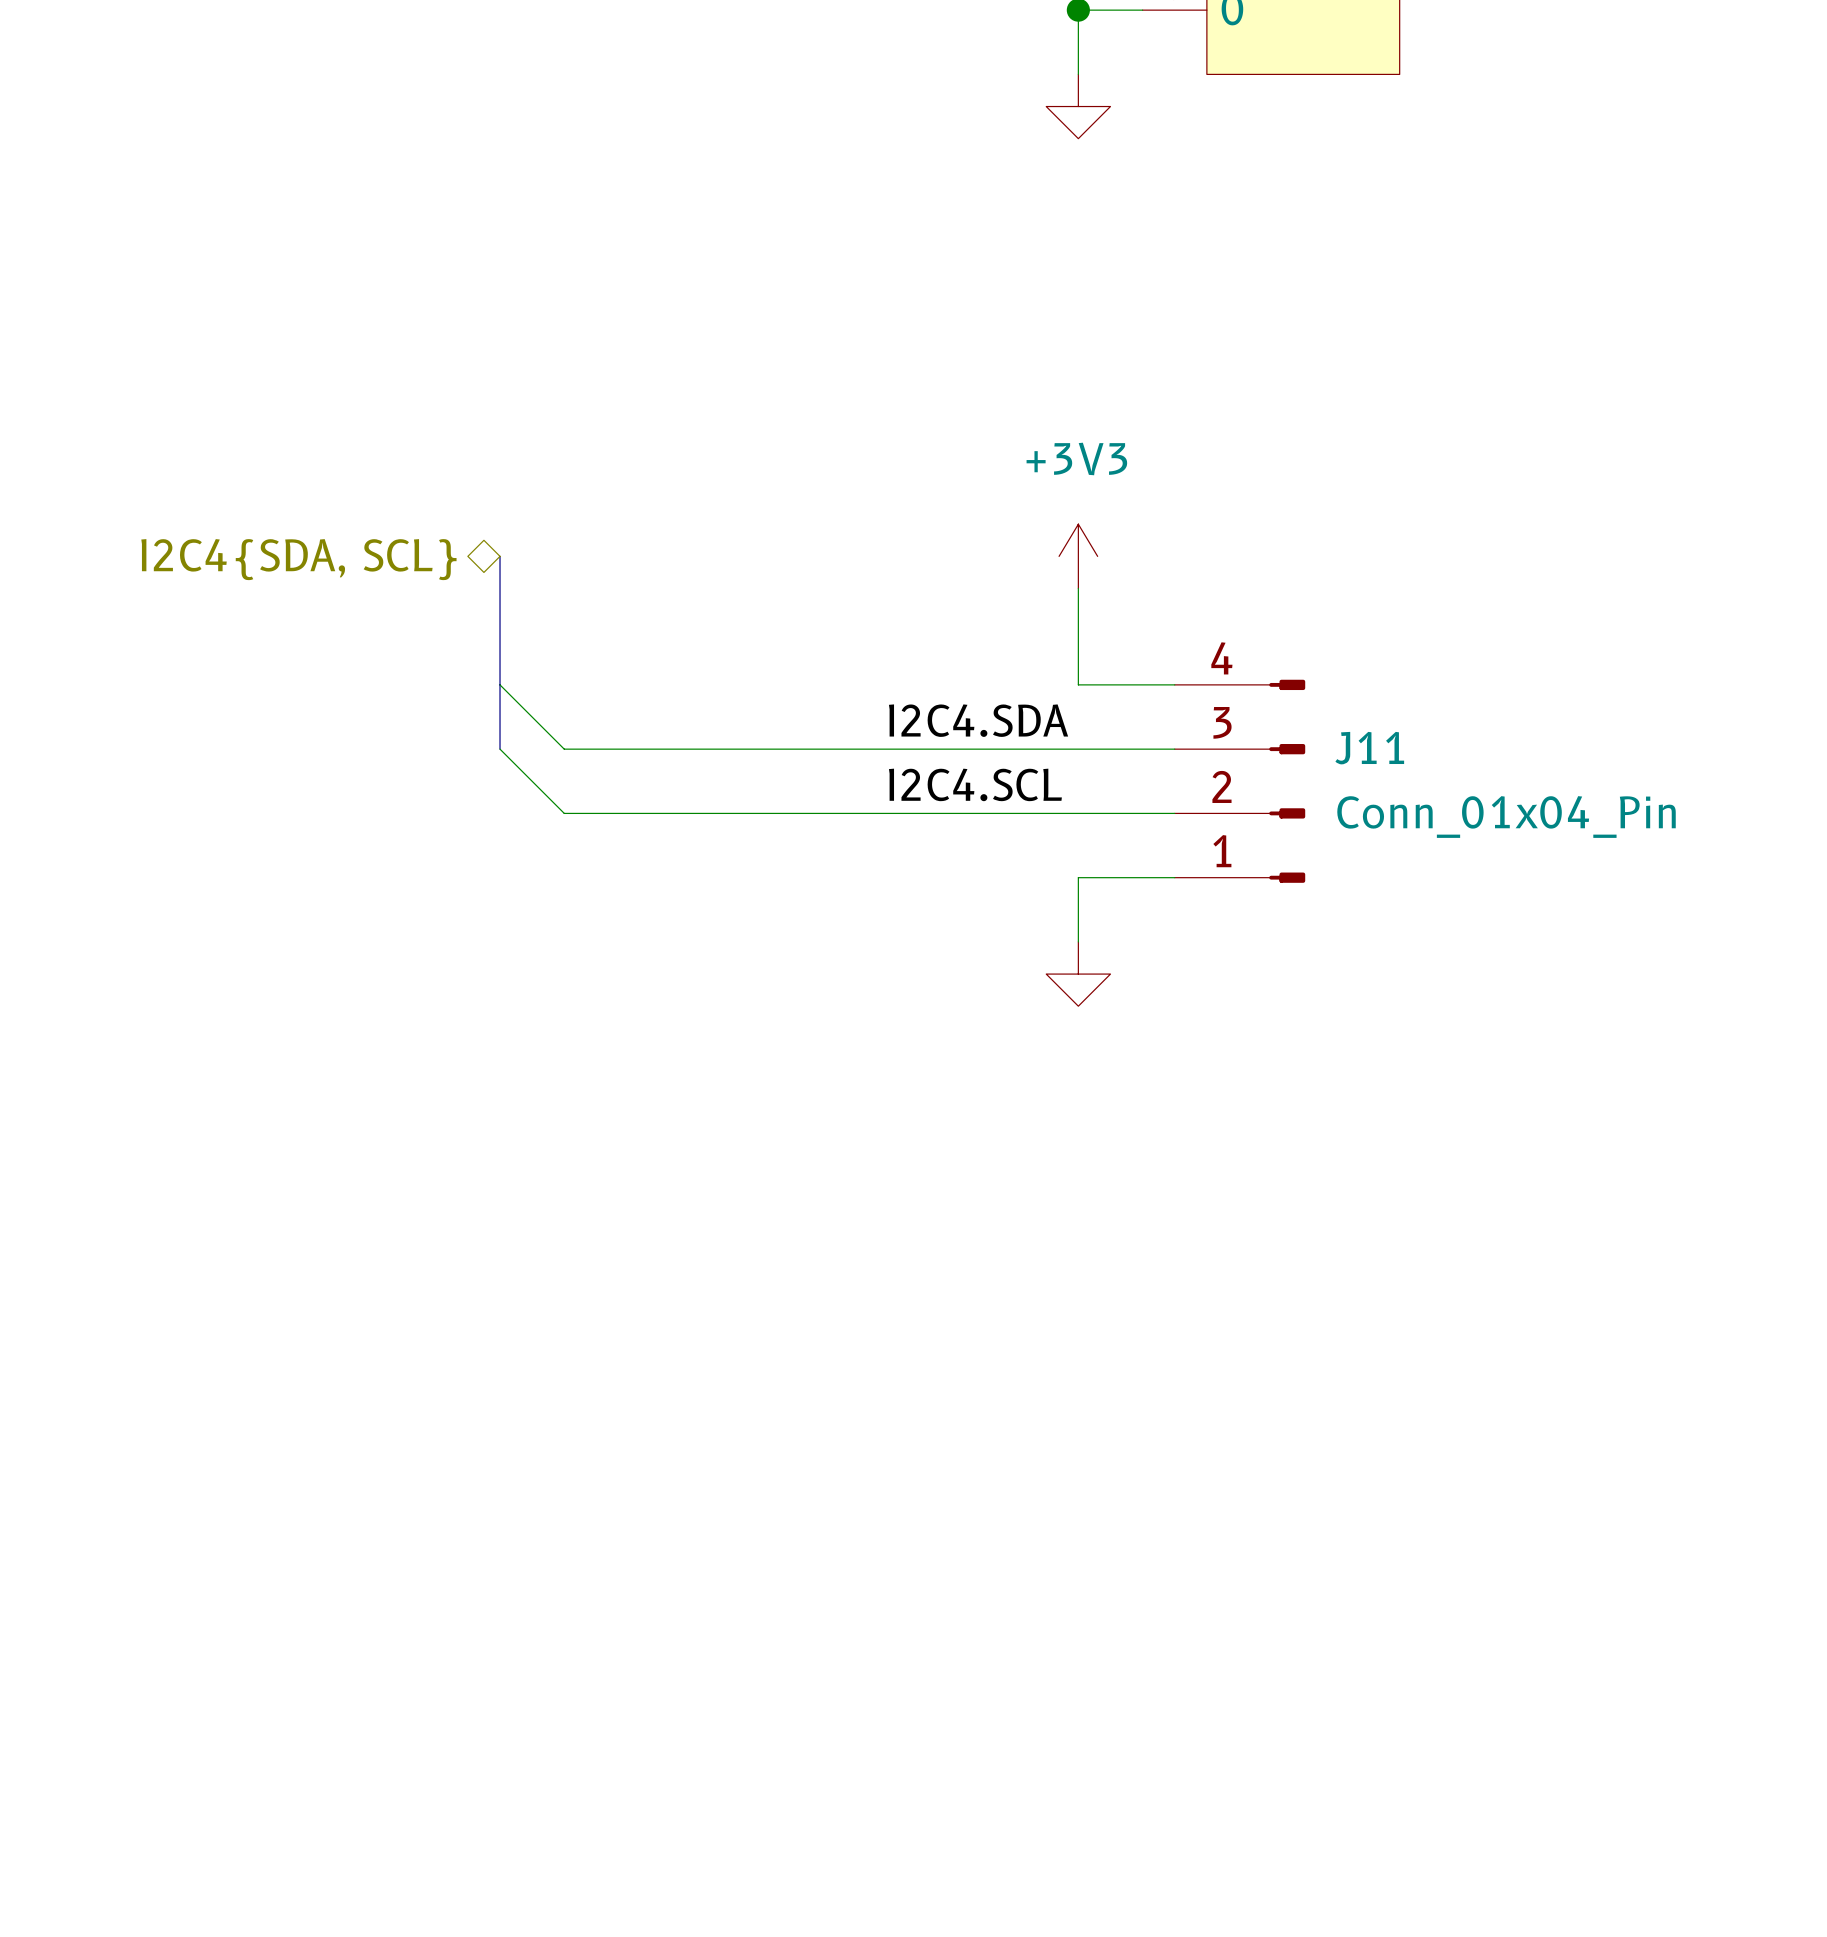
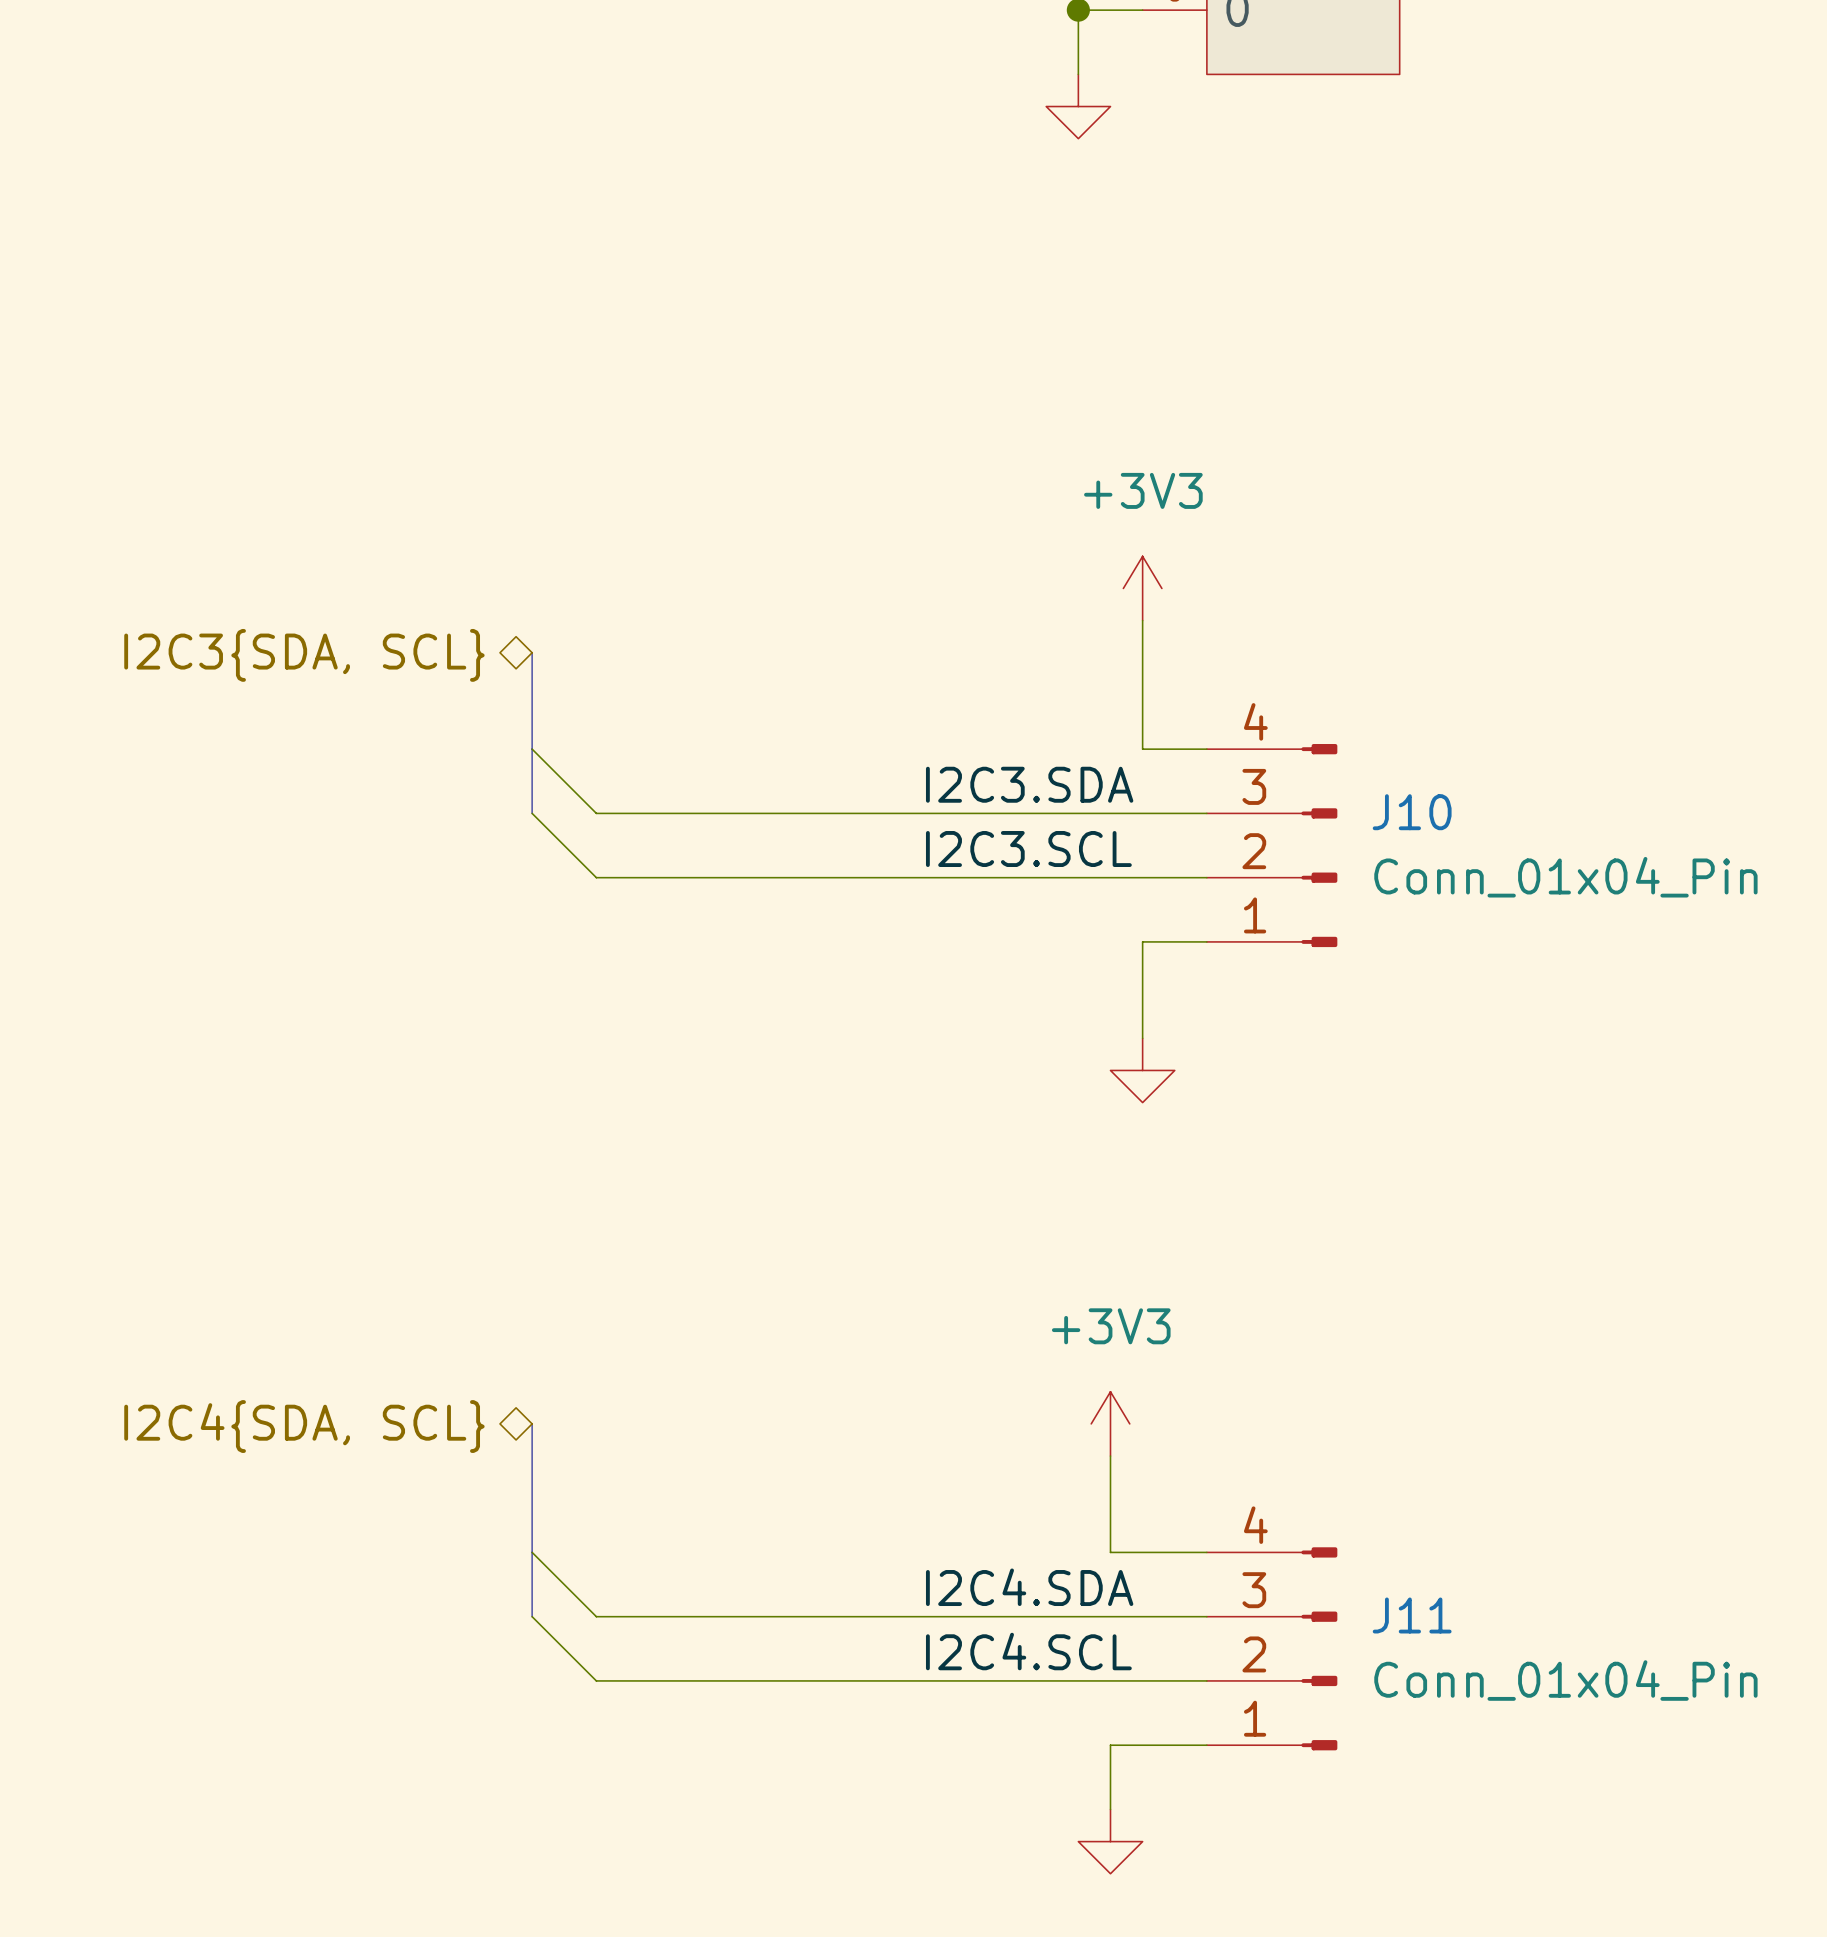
bus: (500, 556) (500, 749) -> none
power symbol position: +3V3 (1078, 556) -> +3V3 (1142, 588)
hierarchical label: I2C4{SDA, SCL} (298, 559) -> none
wire: (1078, 588) (1078, 684) (1174, 684) -> none
bus: none -> (532, 652) (532, 813)
hierarchical label: none -> I2C3{SDA, SCL} (304, 655)
wire: (500, 684) (564, 749) (1142, 749) -> (1142, 620) (1142, 749)
label: I2C4.SDA (978, 720) -> none
wire: (500, 749) (564, 813) (596, 813) -> (532, 749) (596, 813)
J11 position: (1239, 781) -> (1272, 1648)
label: I2C4.SCL (975, 784) -> I2C3.SDA (1029, 784)
J10: none -> Conn_01x04_Pin (1272, 845)
label: none -> I2C3.SCL (1028, 849)
wire: (1078, 877) (1078, 941) -> (1078, 877) (596, 877) (532, 813)
wire: none -> (1206, 941) (1142, 941) (1142, 1038)
power symbol position: (1078, 974) -> (1142, 1070)
bus: none -> (532, 1423) (532, 1616)
power symbol: none -> +3V3 (1110, 1423)
hierarchical label: none -> I2C4{SDA, SCL} (304, 1426)
wire: none -> (1110, 1456) (1110, 1552) (1206, 1552)
wire: none -> (532, 1552) (596, 1616) (1206, 1616)
label: none -> I2C4.SDA (1029, 1587)
wire: none -> (532, 1616) (596, 1680) (1206, 1680)
label: none -> I2C4.SCL (1028, 1651)
wire: none -> (1206, 1745) (1110, 1745) (1110, 1809)
power symbol: none -> (1110, 1841)

